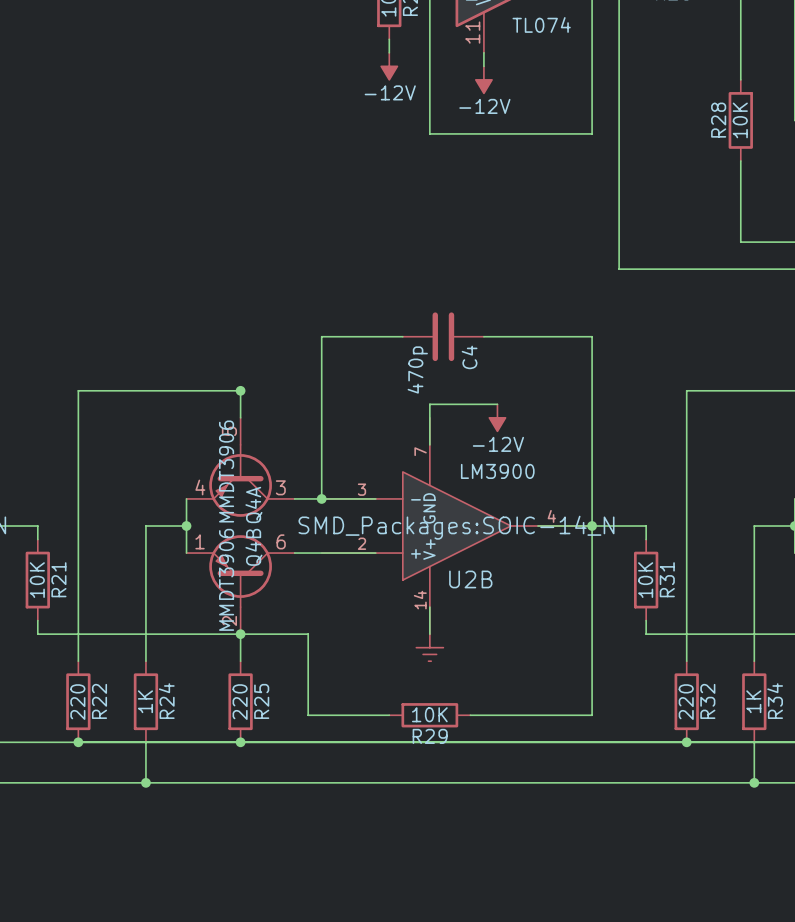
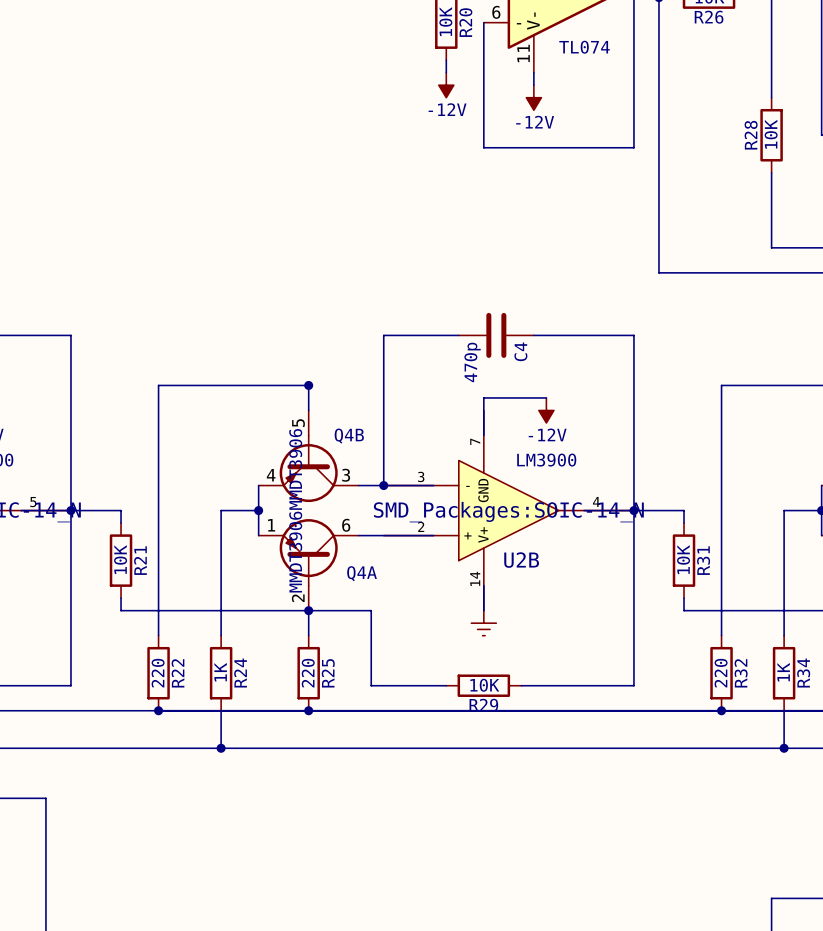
Q4A name rotation: 0° (253, 504) -> 90° clockwise (362, 573)
Q4A name position: Q4A (253, 504) -> Q4A (362, 573)
Q4B name rotation: 0° (253, 547) -> 90° clockwise (349, 436)
Q4B name position: Q4B (253, 547) -> Q4B (349, 436)

